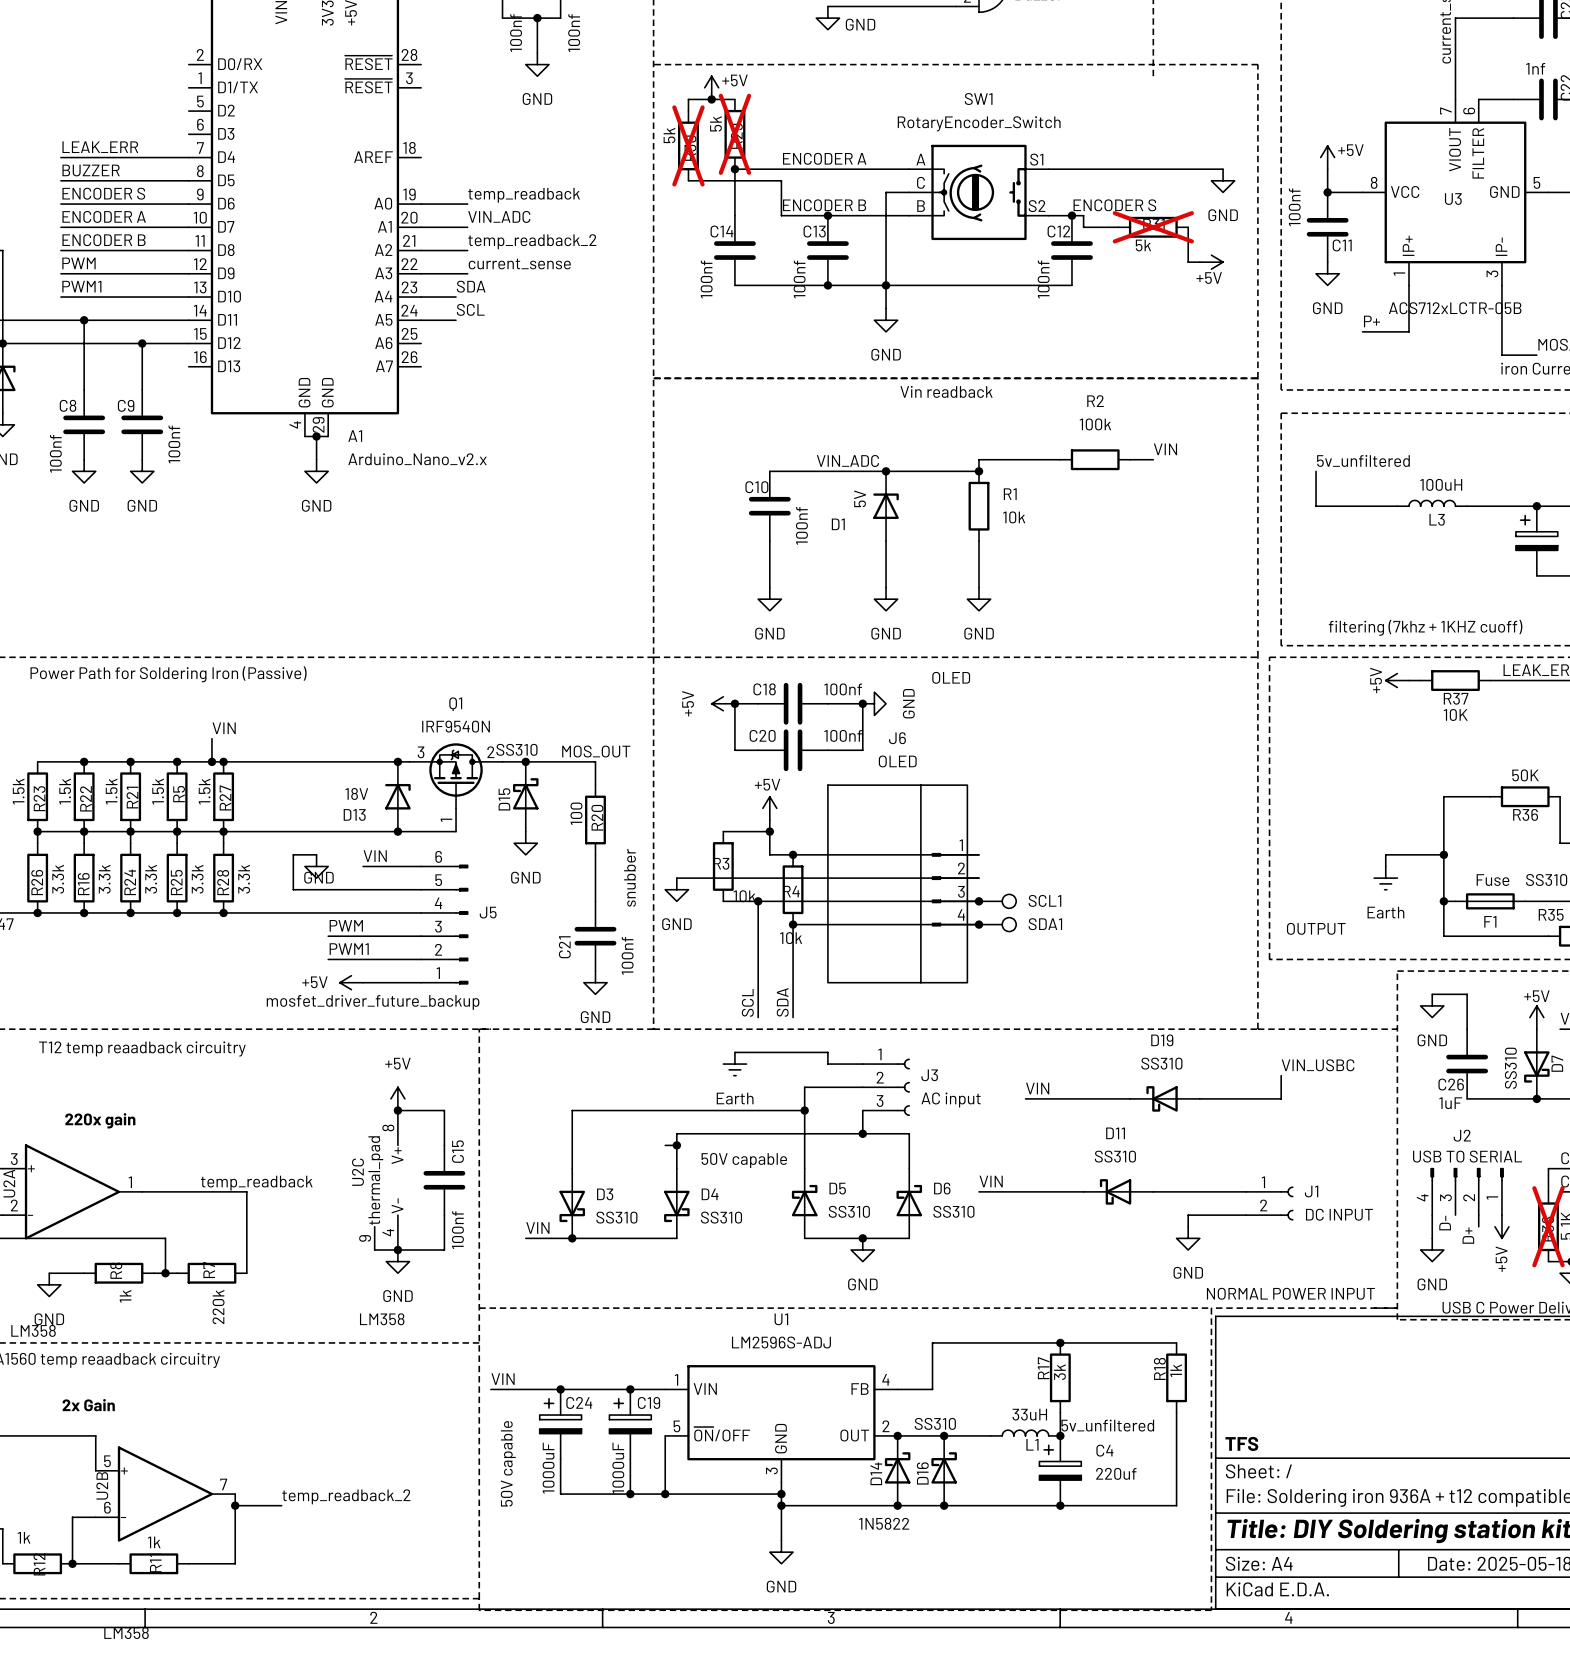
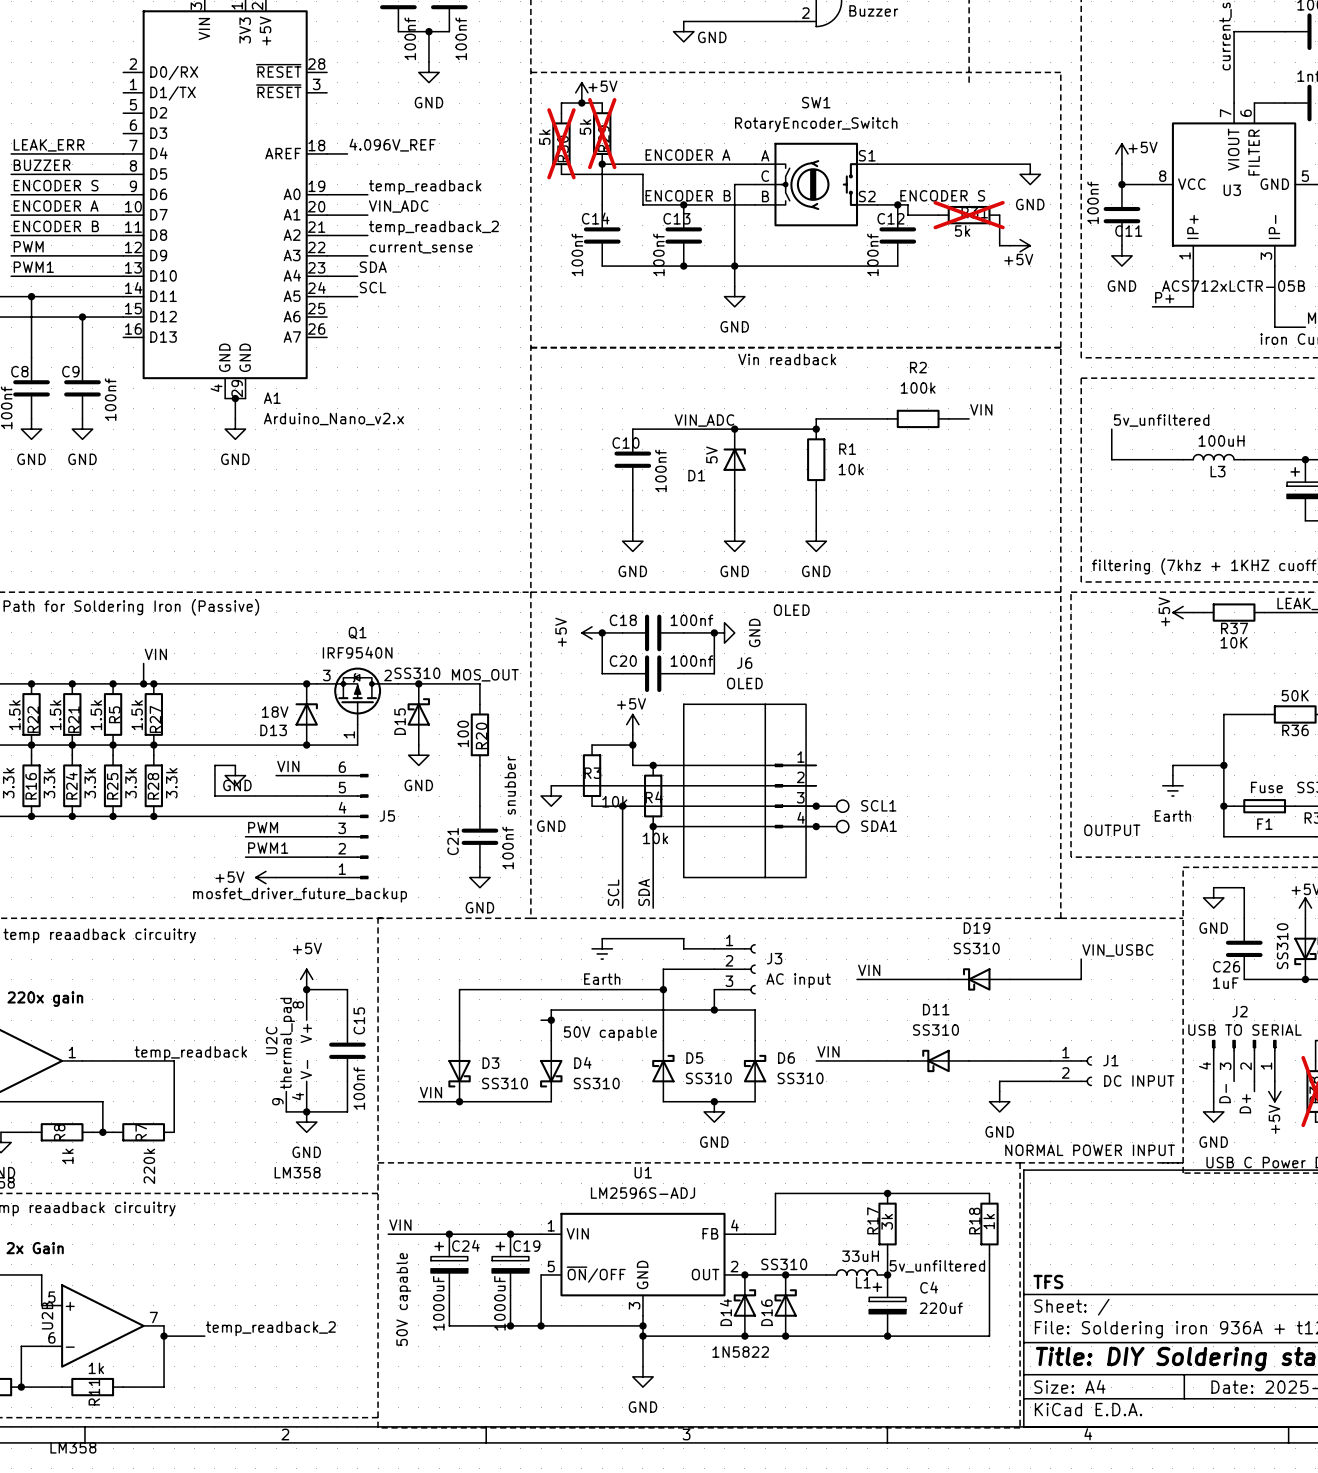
label: none -> 4.096V_REF (392, 145)
wire: none -> (327, 153) (347, 153)

